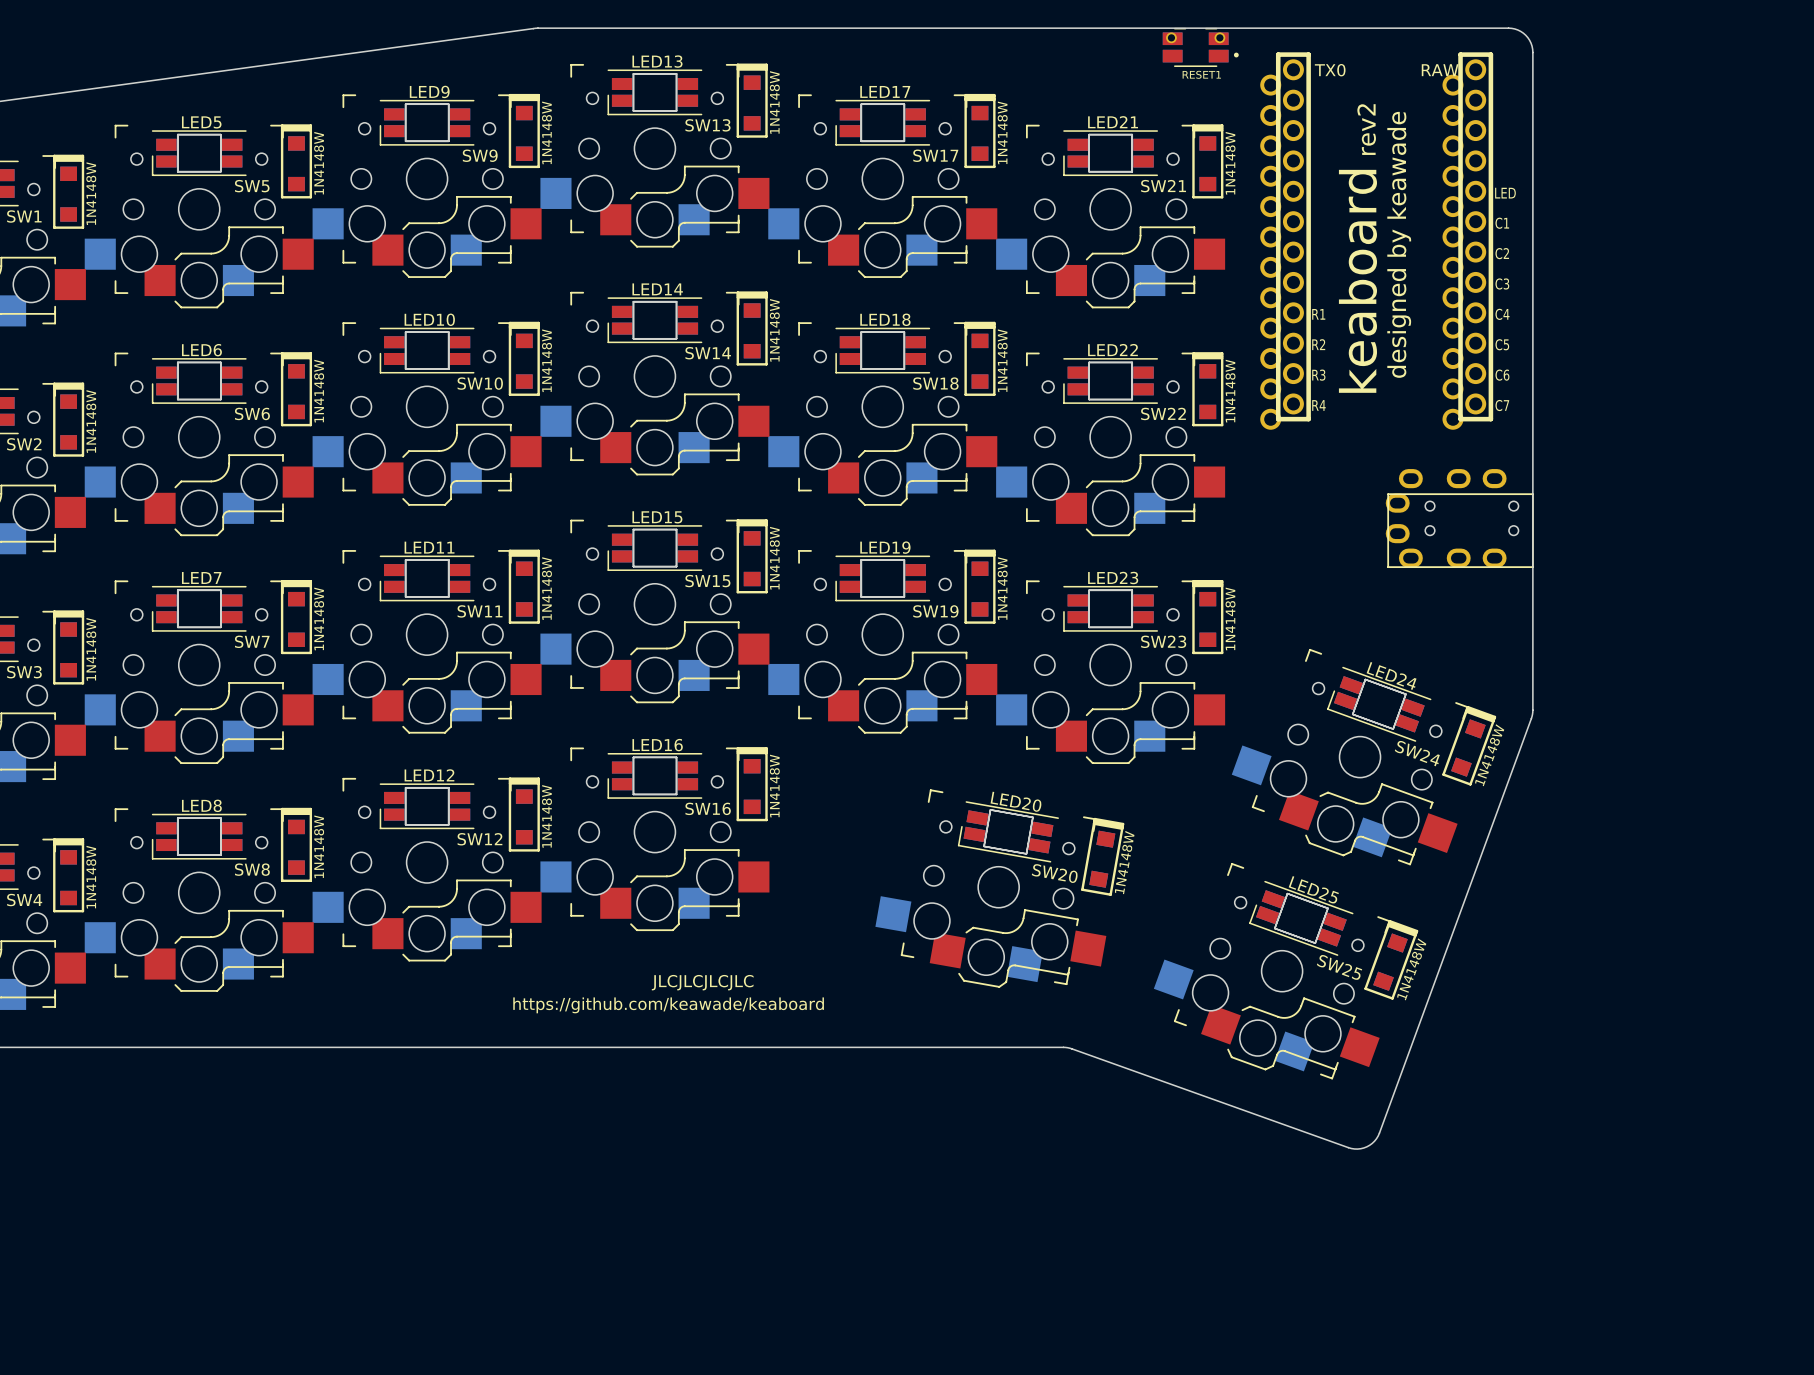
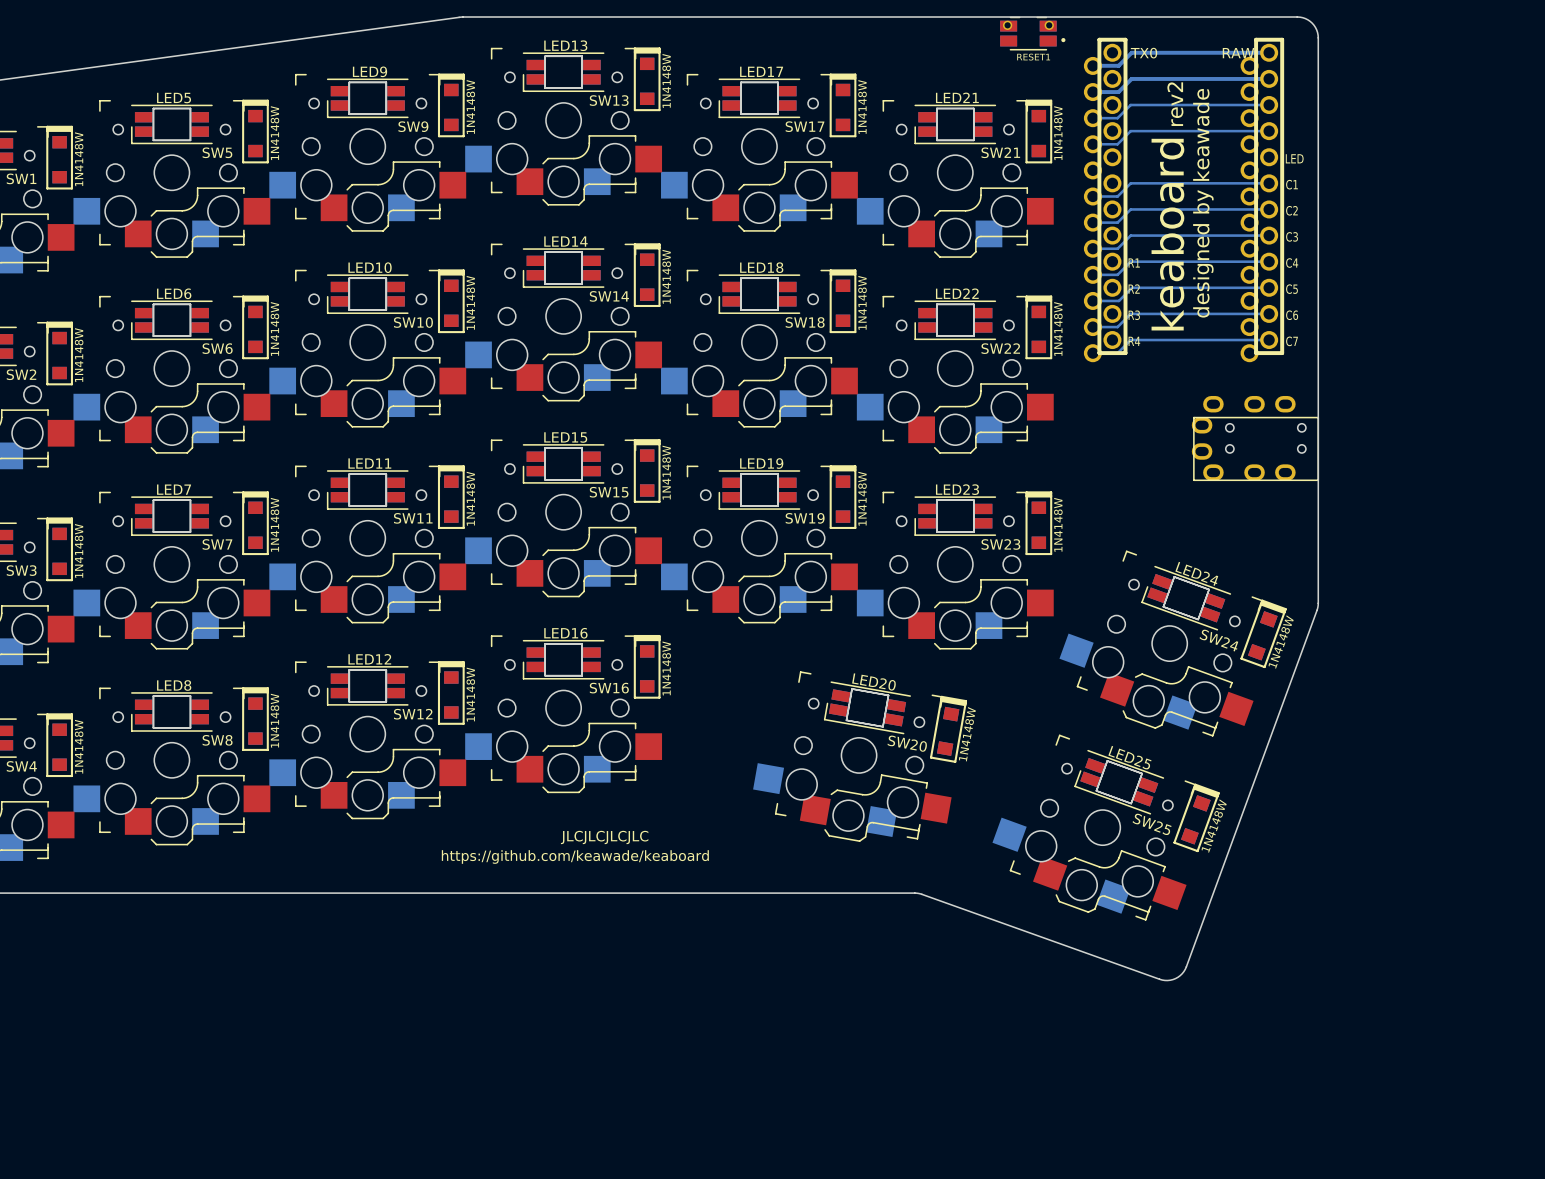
bottom track: none -> (1269, 52) (1131, 52) (1118, 65) (1093, 65)
bottom track: none -> (1269, 78) (1131, 78) (1118, 92) (1092, 92)
bottom track: none -> (1269, 105) (1130, 105) (1117, 118) (1092, 118)
bottom track: none -> (1269, 131) (1130, 131) (1117, 144) (1092, 144)
bottom track: none -> (1269, 183) (1130, 183) (1117, 196) (1092, 196)
bottom track: none -> (1269, 209) (1130, 209) (1117, 222) (1092, 222)
bottom track: none -> (1269, 235) (1130, 235) (1117, 248) (1092, 248)
bottom track: none -> (1269, 261) (1130, 261) (1117, 274) (1092, 274)
bottom track: none -> (1269, 287) (1132, 287) (1118, 300) (1092, 300)
bottom track: none -> (1269, 313) (1130, 313) (1117, 327) (1092, 327)
bottom track: none -> (1269, 340) (1130, 340) (1117, 353) (1092, 353)

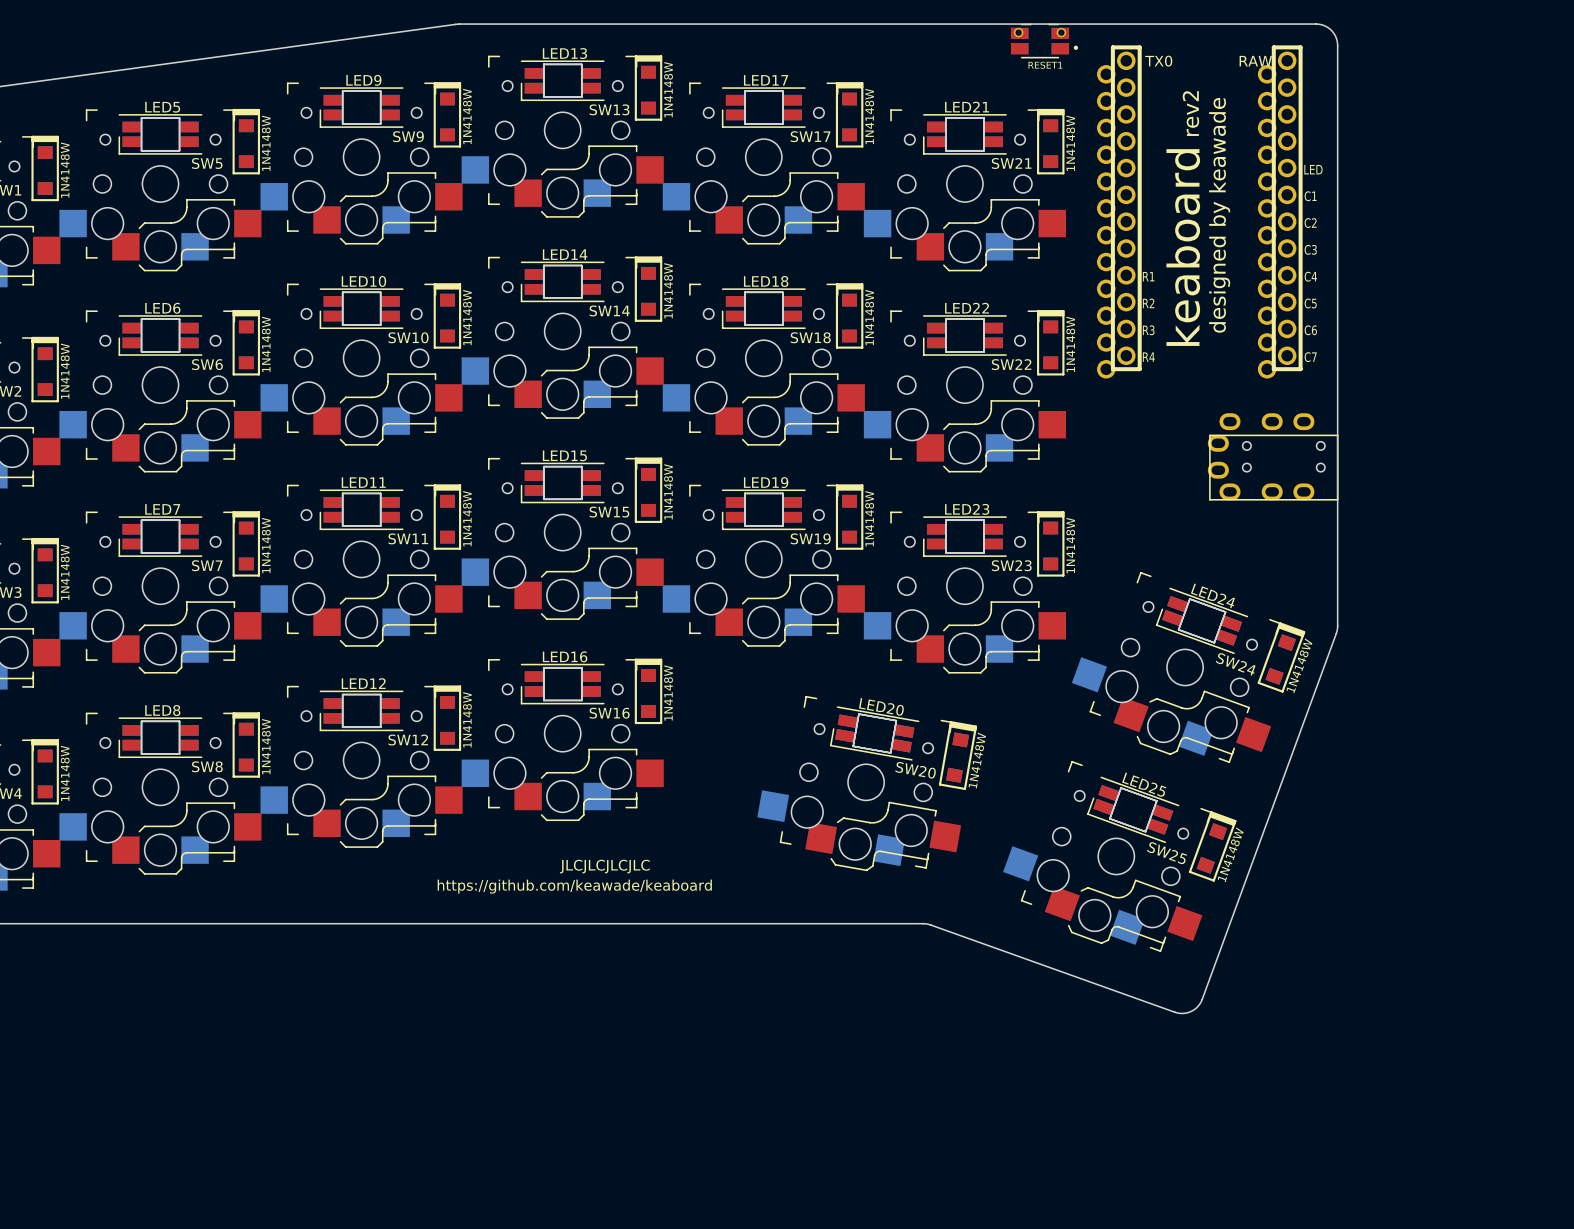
bottom track: (1269, 52) (1131, 52) (1118, 65) (1093, 65) -> none
bottom track: (1269, 78) (1131, 78) (1118, 92) (1092, 92) -> none
bottom track: (1269, 105) (1130, 105) (1117, 118) (1092, 118) -> none
bottom track: (1269, 131) (1130, 131) (1117, 144) (1092, 144) -> none
bottom track: (1269, 183) (1130, 183) (1117, 196) (1092, 196) -> none
bottom track: (1269, 209) (1130, 209) (1117, 222) (1092, 222) -> none
bottom track: (1269, 235) (1130, 235) (1117, 248) (1092, 248) -> none
bottom track: (1269, 261) (1130, 261) (1117, 274) (1092, 274) -> none
bottom track: (1269, 287) (1132, 287) (1118, 300) (1092, 300) -> none
bottom track: (1269, 313) (1130, 313) (1117, 327) (1092, 327) -> none
bottom track: (1269, 340) (1130, 340) (1117, 353) (1092, 353) -> none

